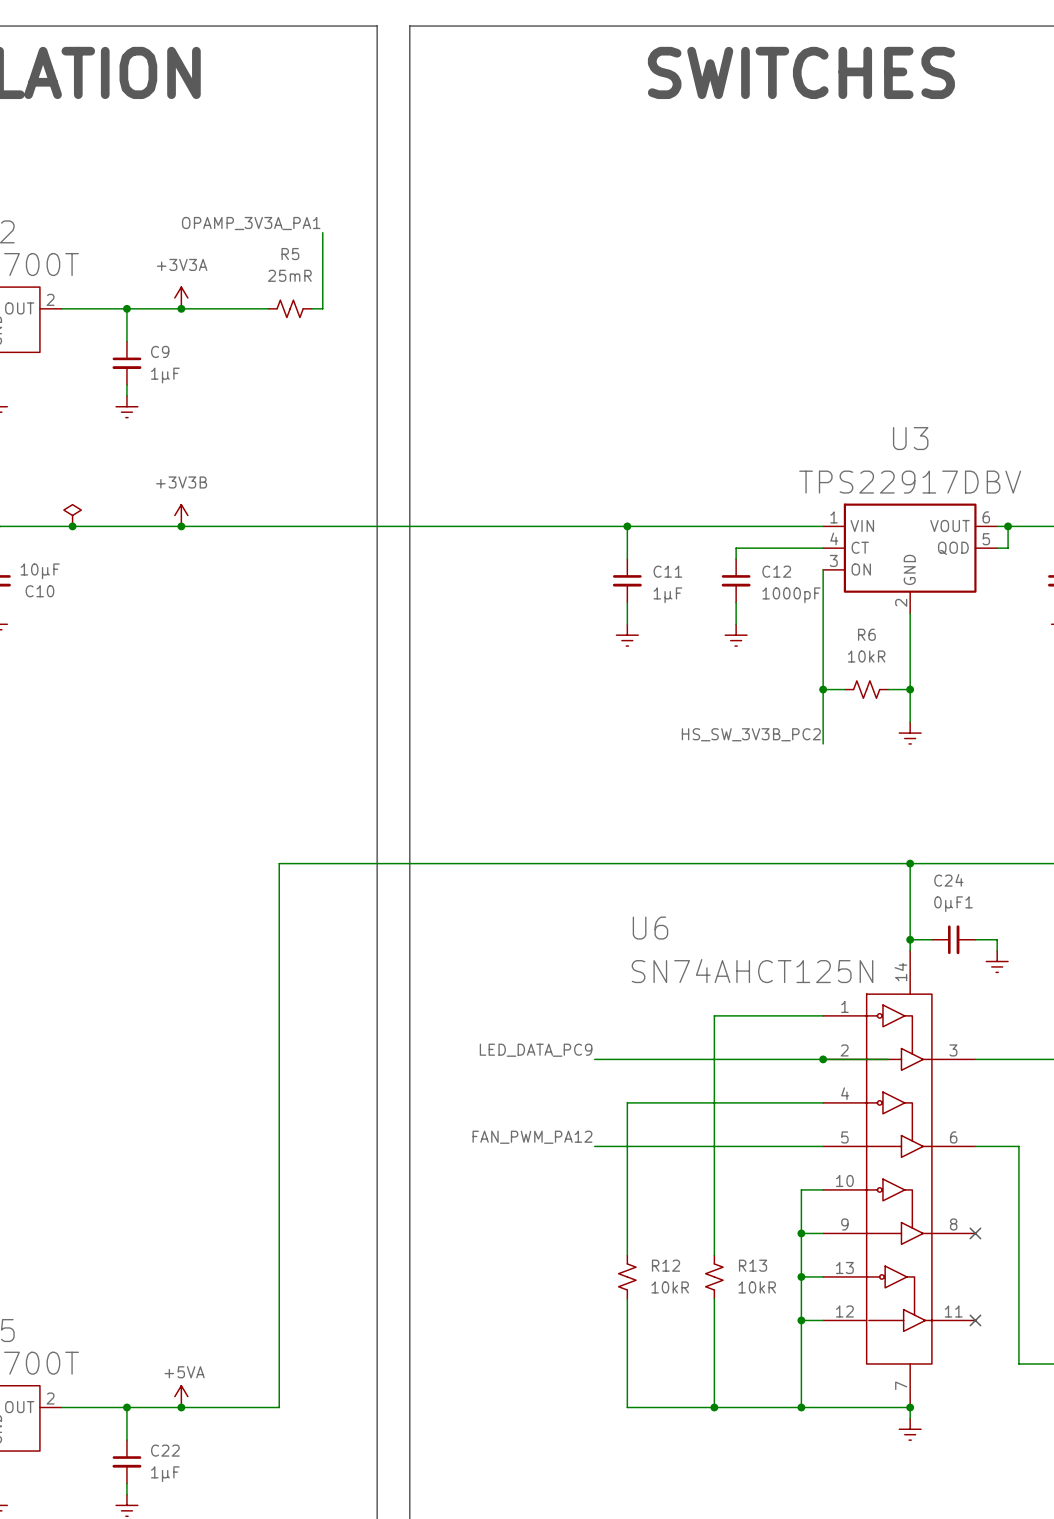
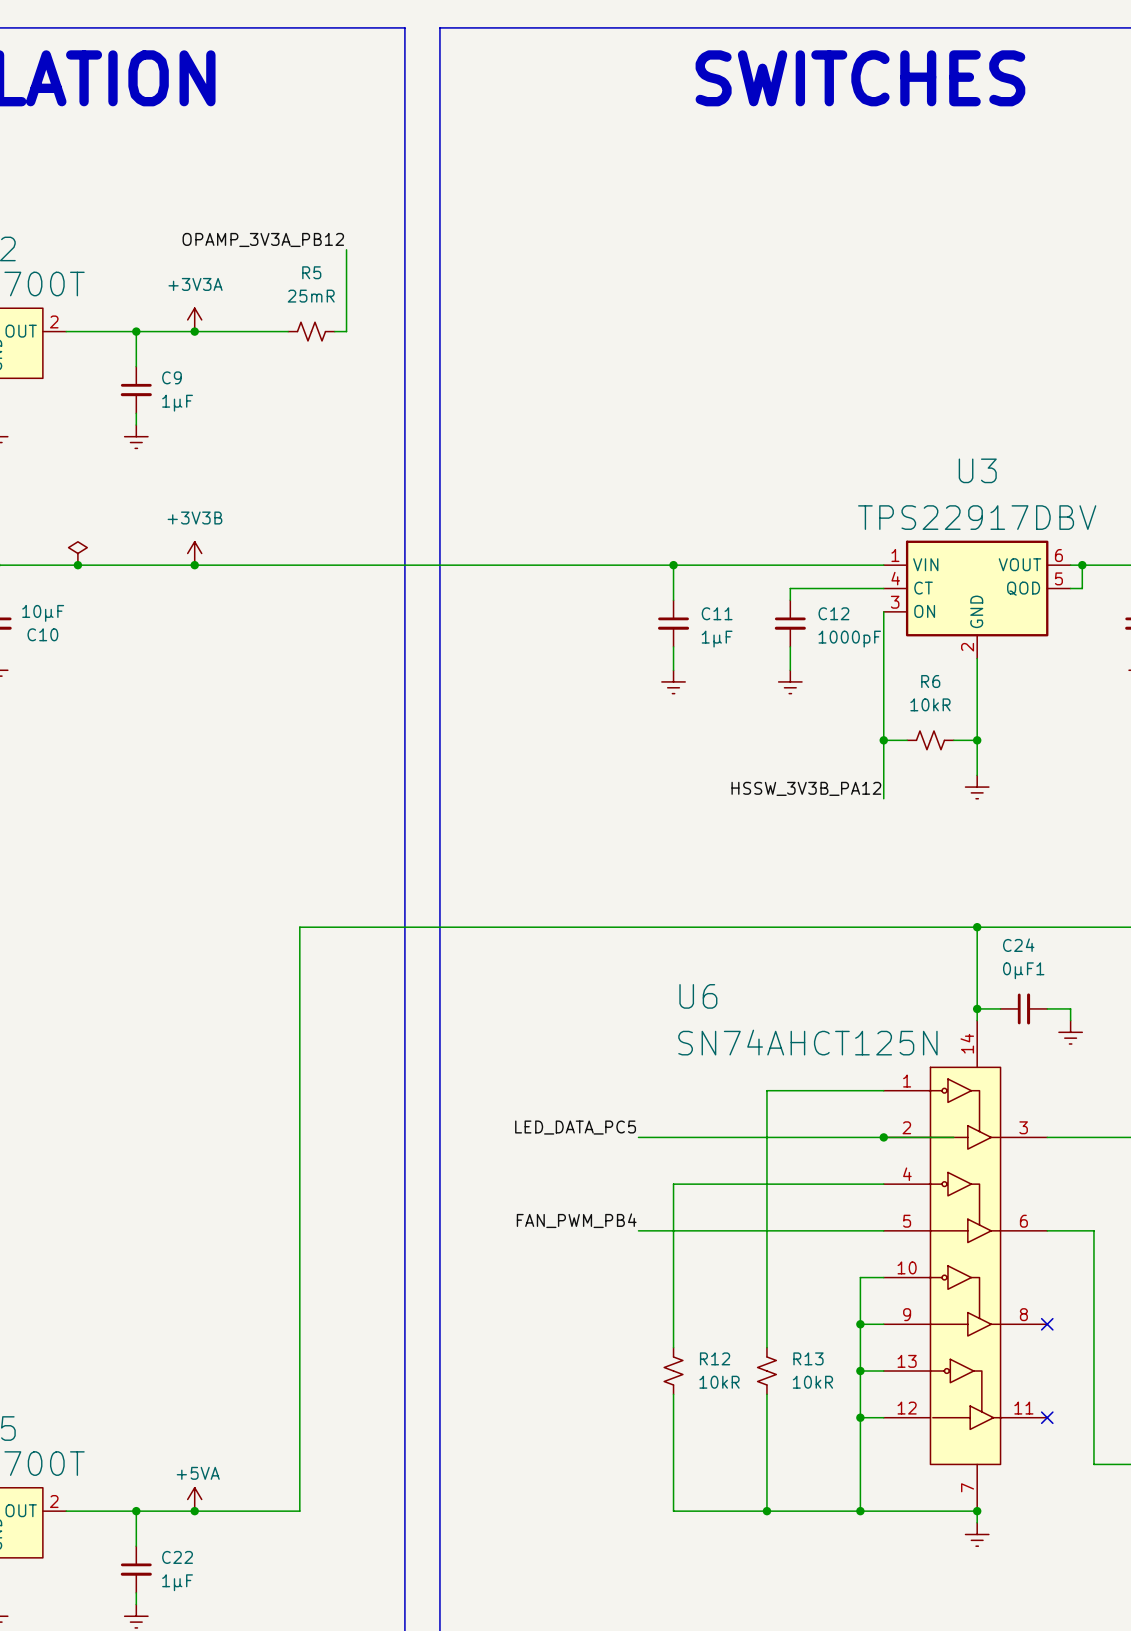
label: OPAMP_3V3A_PA1 (251, 223) -> OPAMP_3V3A_PB12 (263, 239)
label: HS_SW_3V3B_PC2 (751, 734) -> HSSW_3V3B_PA12 (806, 788)
label: LED_DATA_PC9 (536, 1050) -> LED_DATA_PC5 (575, 1127)
label: FAN_PWM_PA12 (532, 1137) -> FAN_PWM_PB4 (576, 1220)

